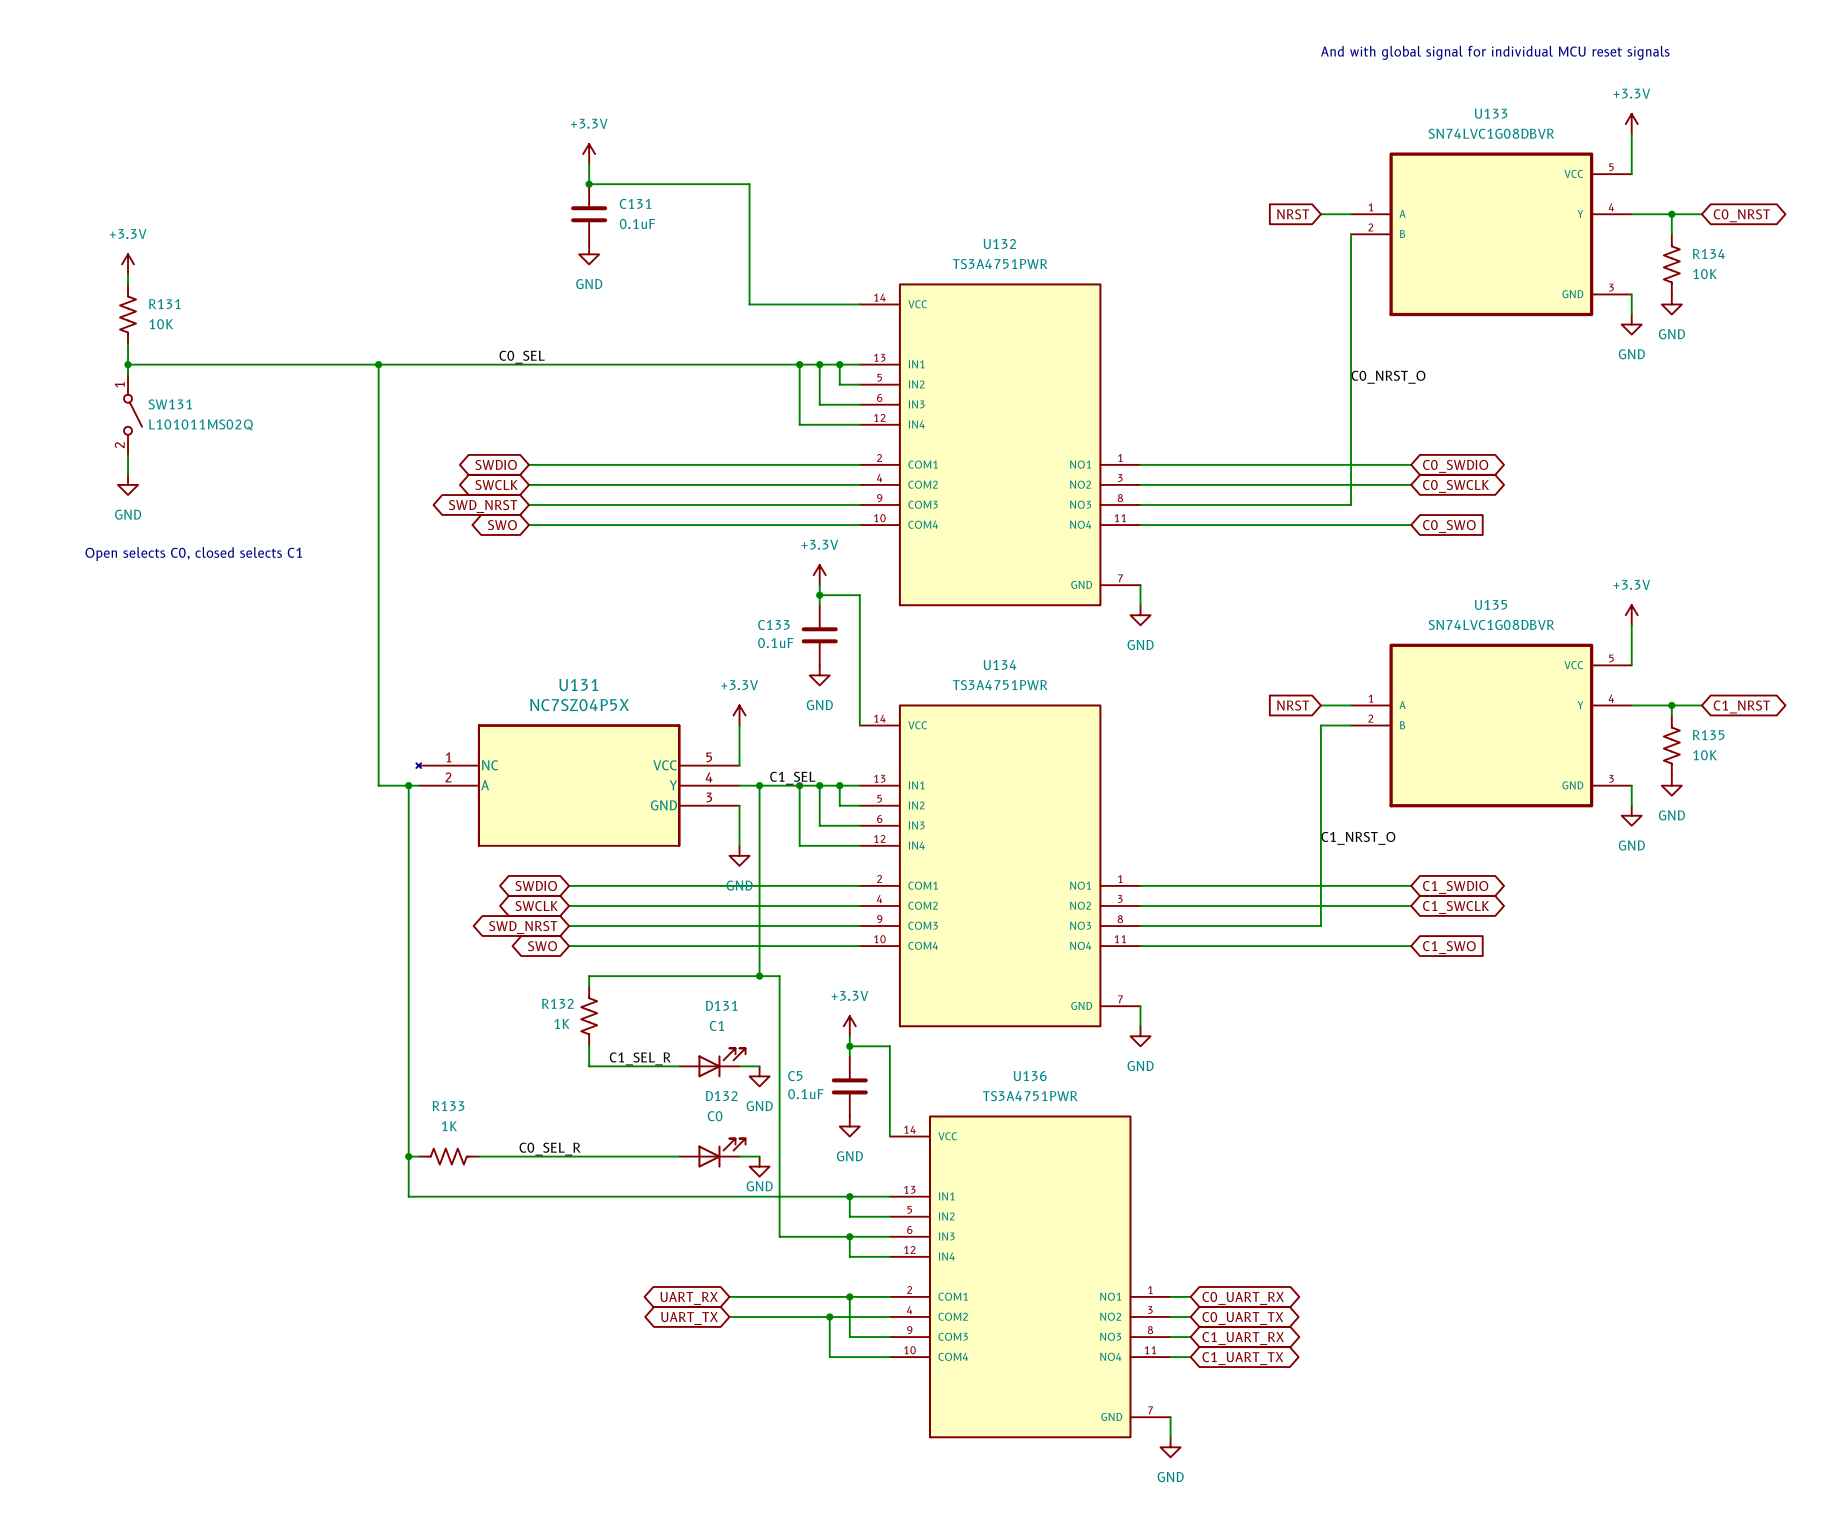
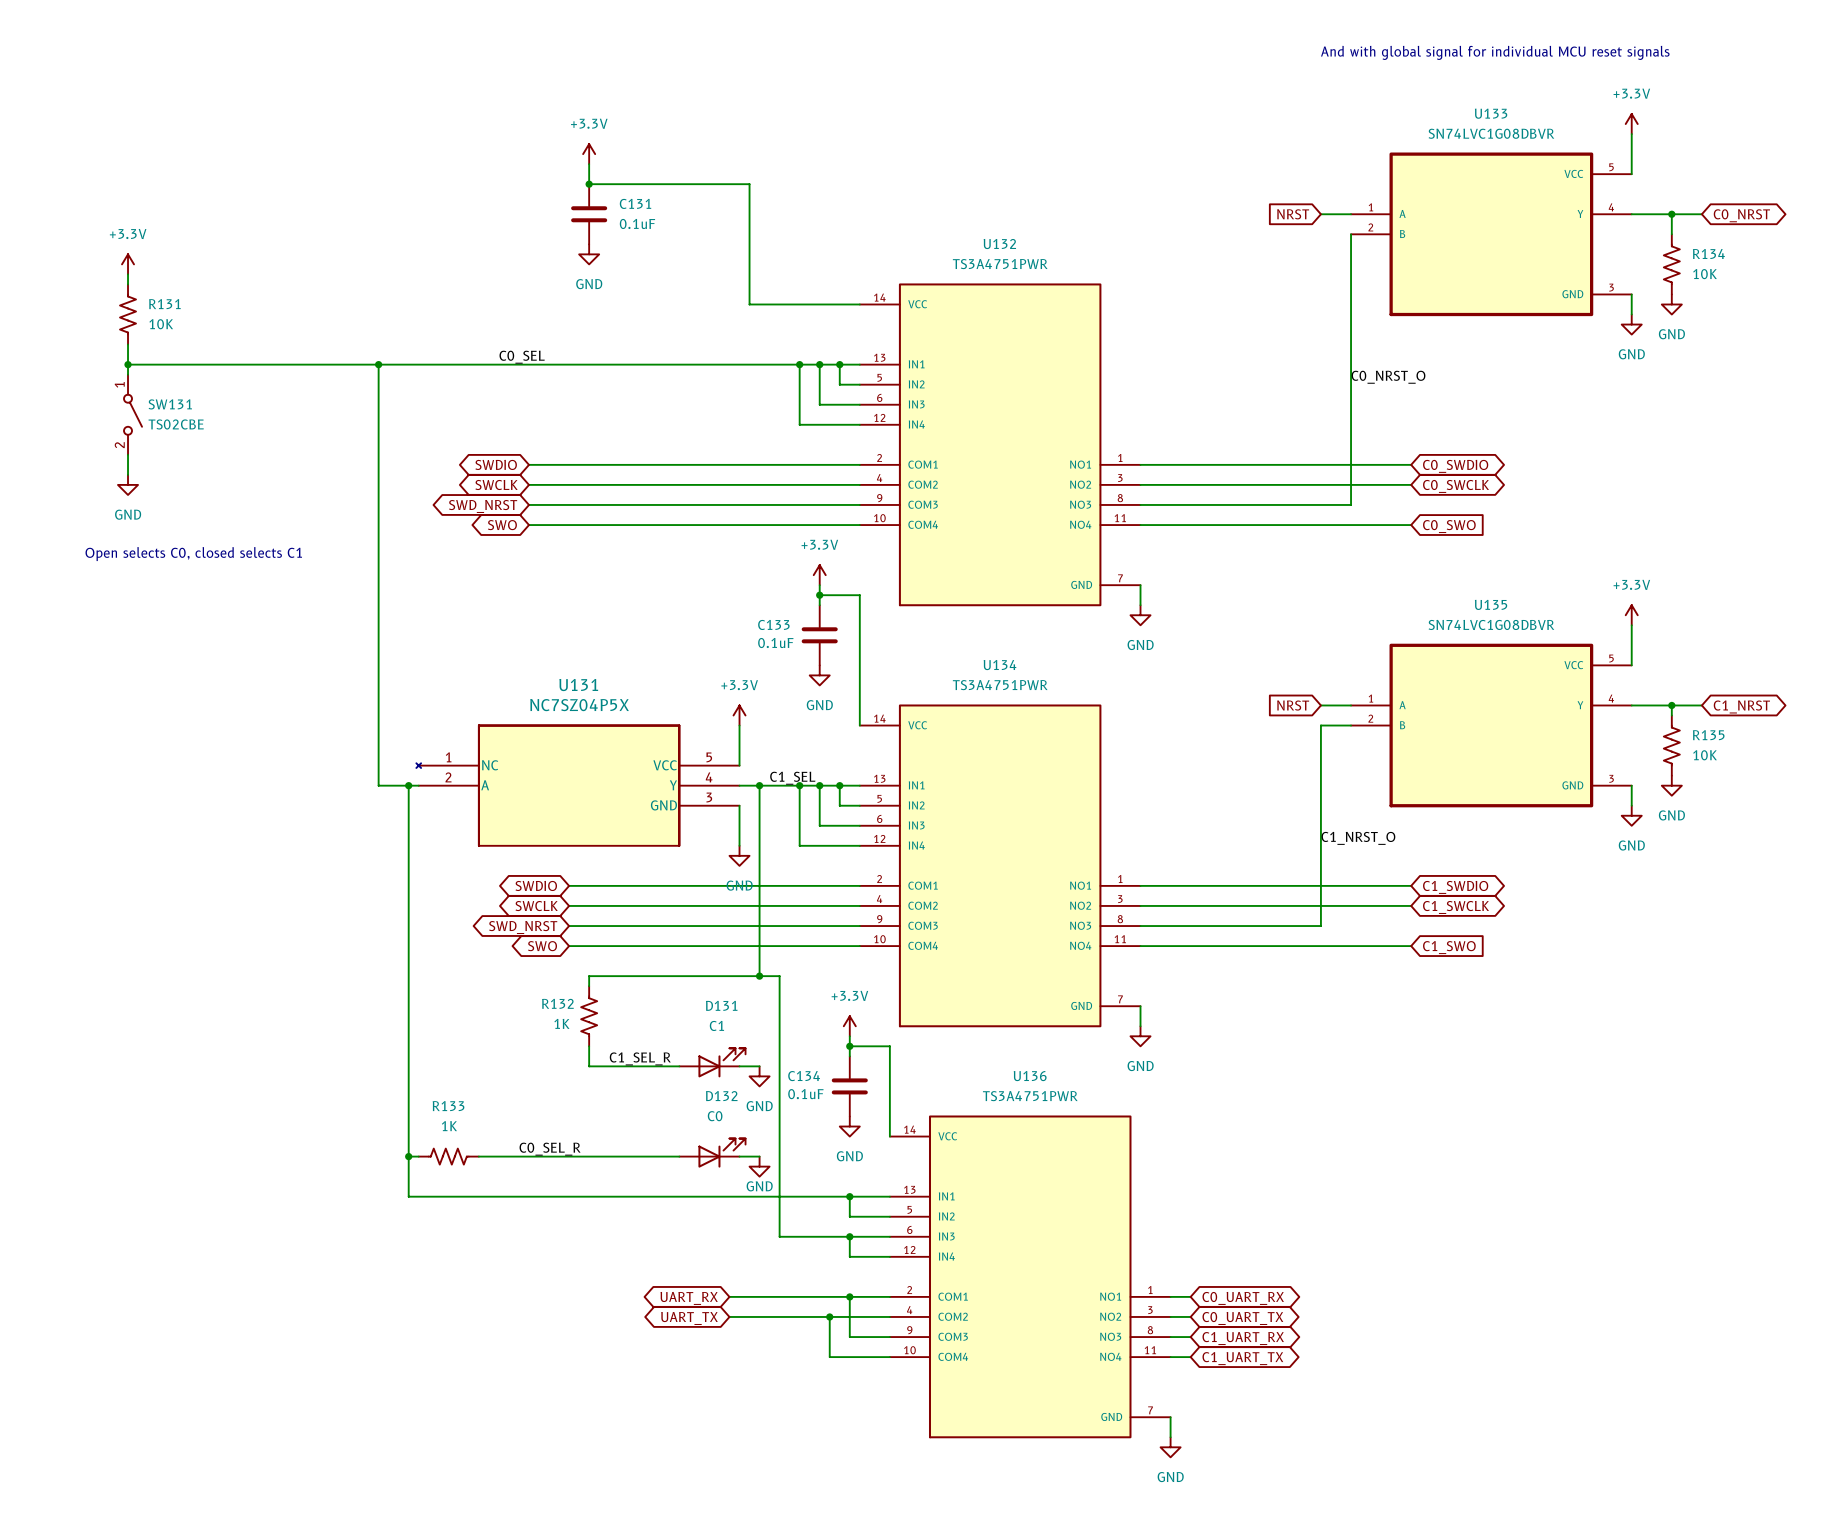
SW131 value: L101011MS02Q (200, 424) -> TS02CBE (176, 424)
C5 name: C5 (795, 1076) -> C134 (804, 1076)

